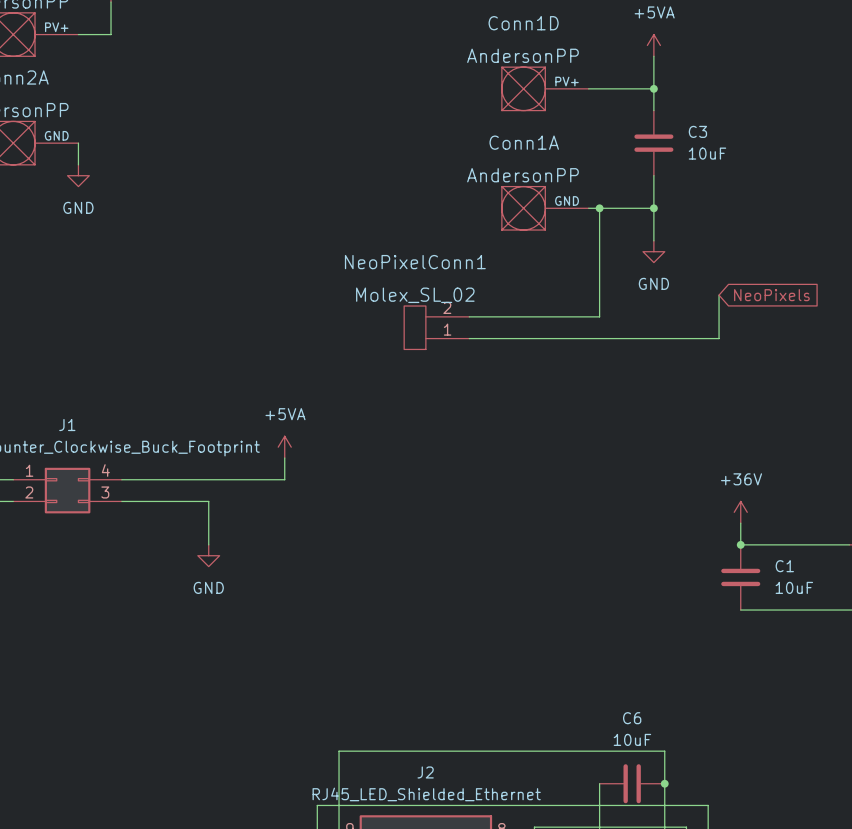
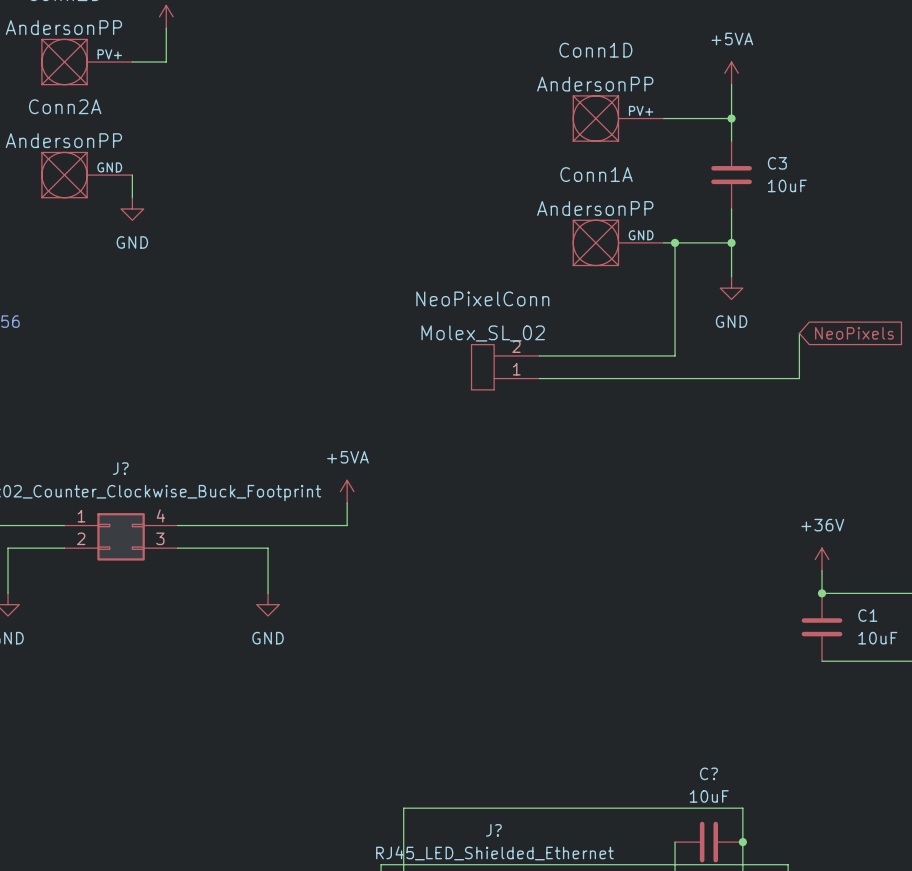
NeoPixelConn1 name: NeoPixelConn1 (415, 262) -> NeoPixelConn (482, 298)
J1 name: J1 (67, 425) -> J? (120, 468)
C6 name: C6 (632, 718) -> C? (708, 773)
J2 name: J2 (425, 772) -> J? (493, 830)

